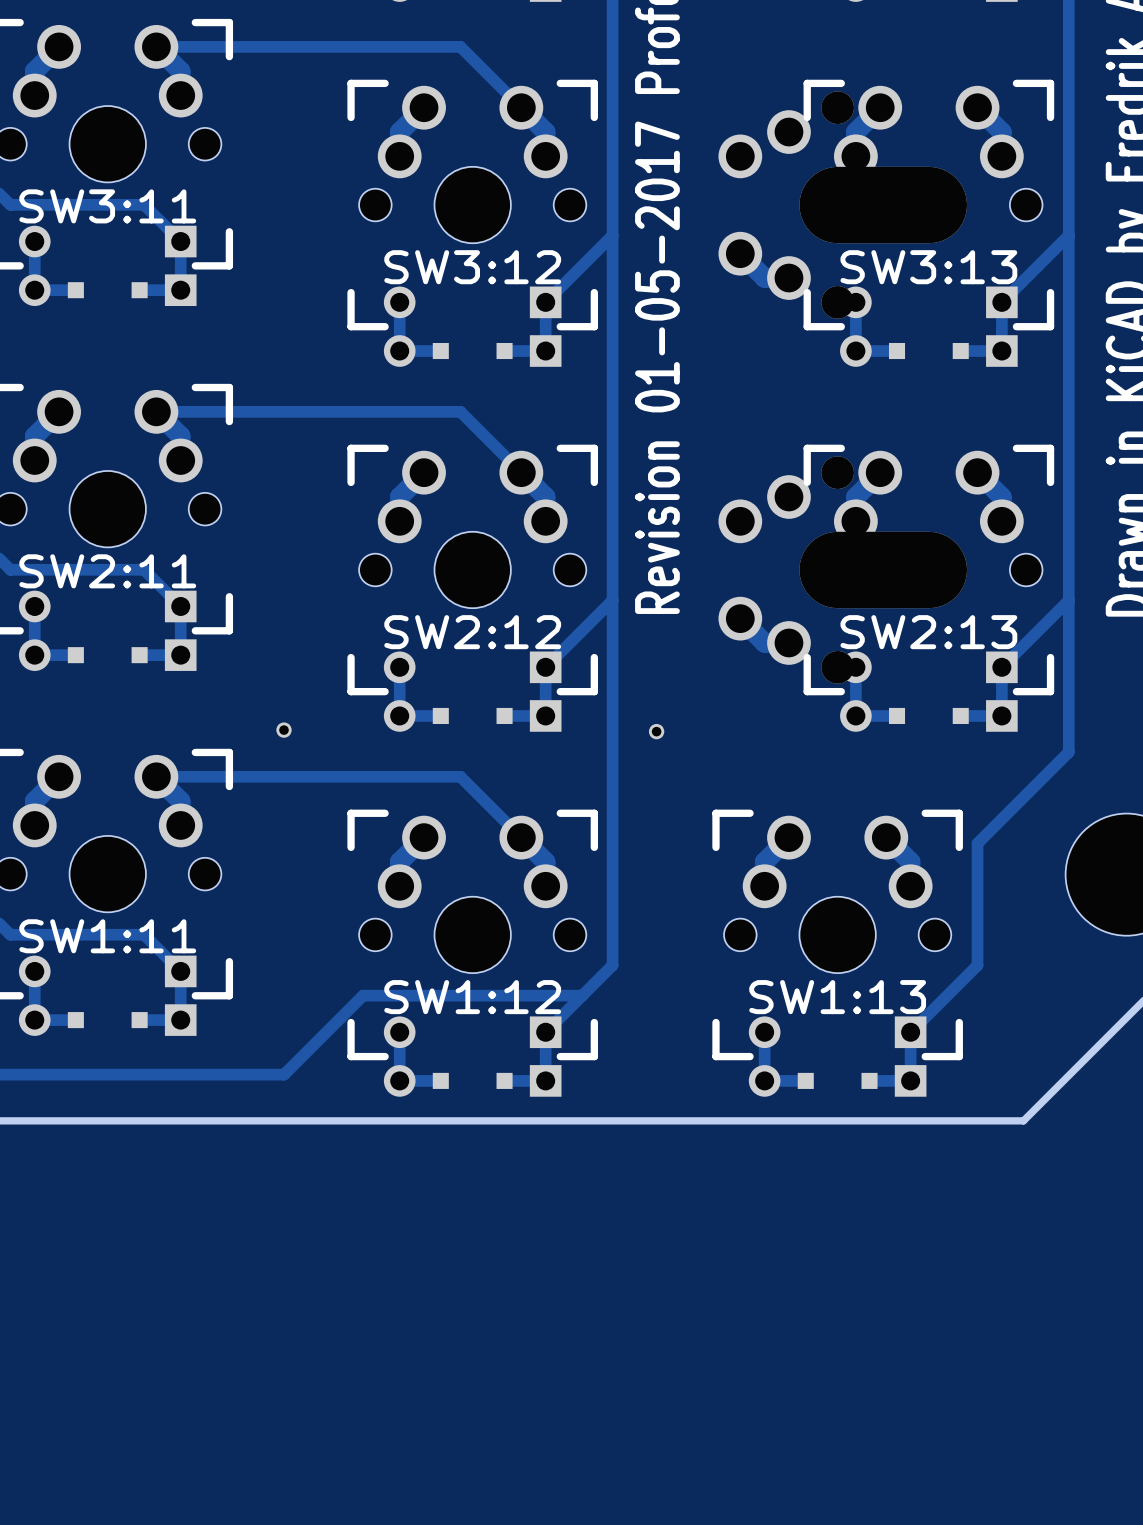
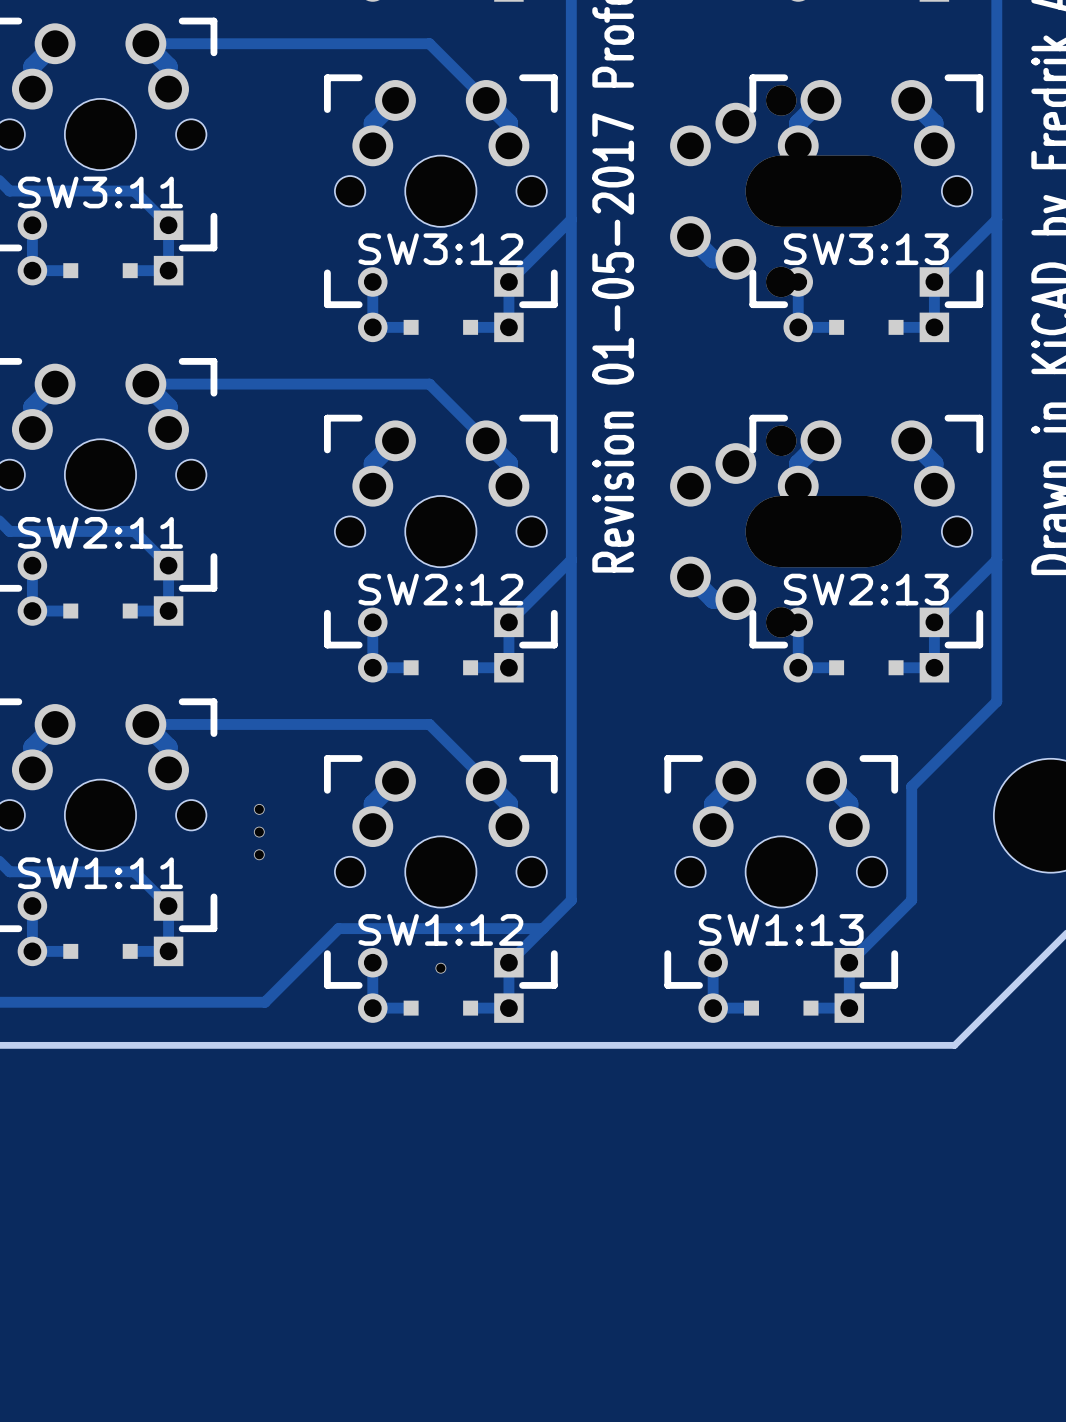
part: (283, 730) -> none
part: (656, 731) -> none
via: none -> (259, 809)
via: none -> (259, 832)
via: none -> (259, 854)
via: none -> (440, 968)

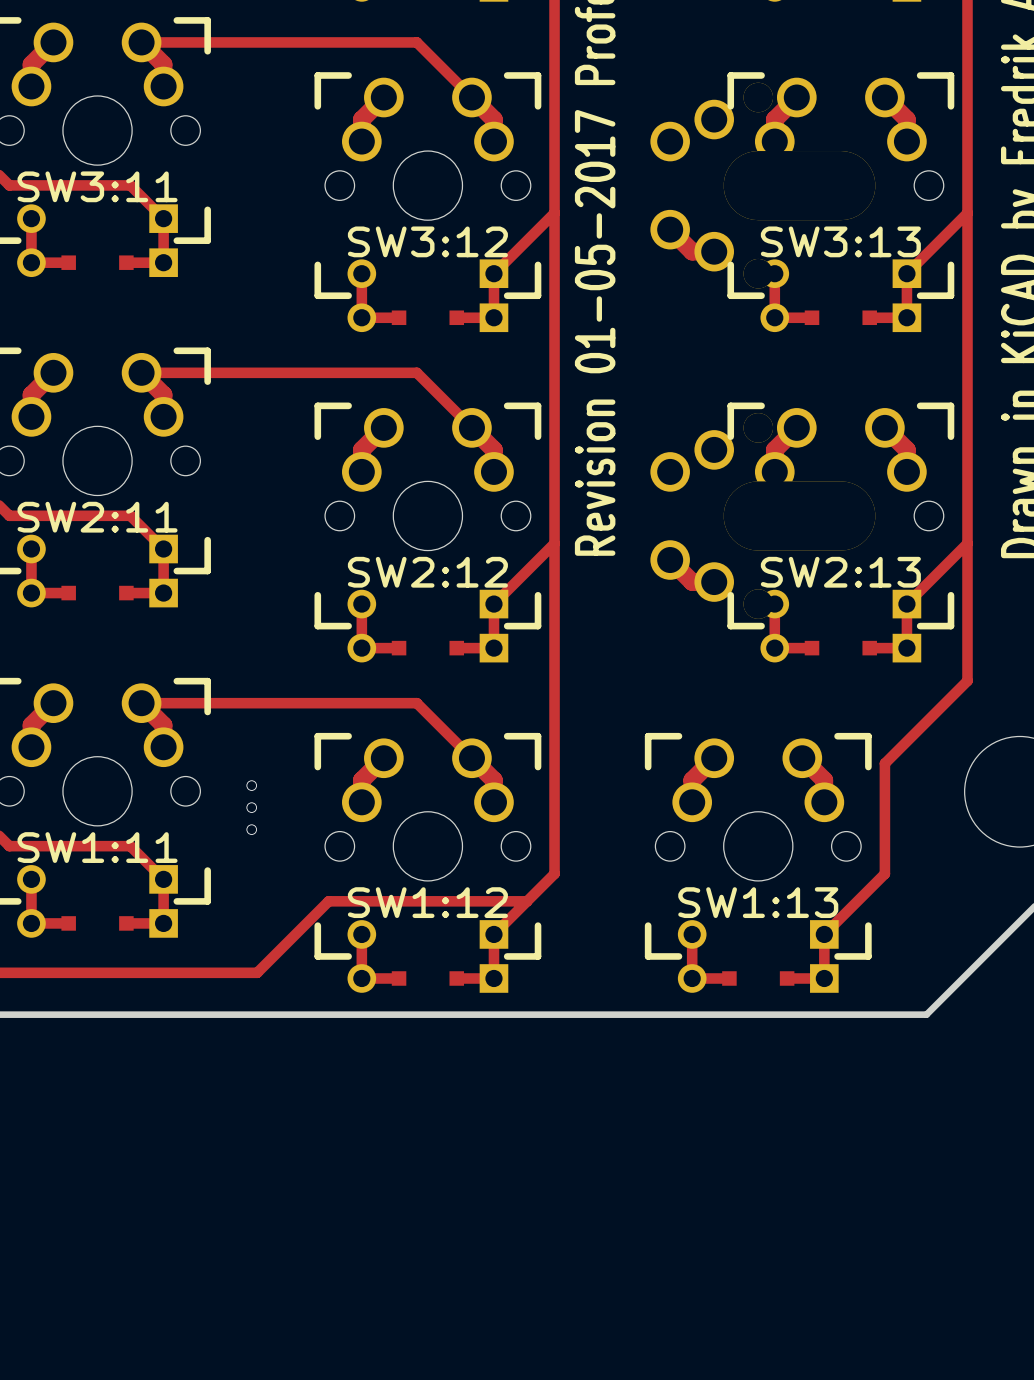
via: (440, 968) -> none

